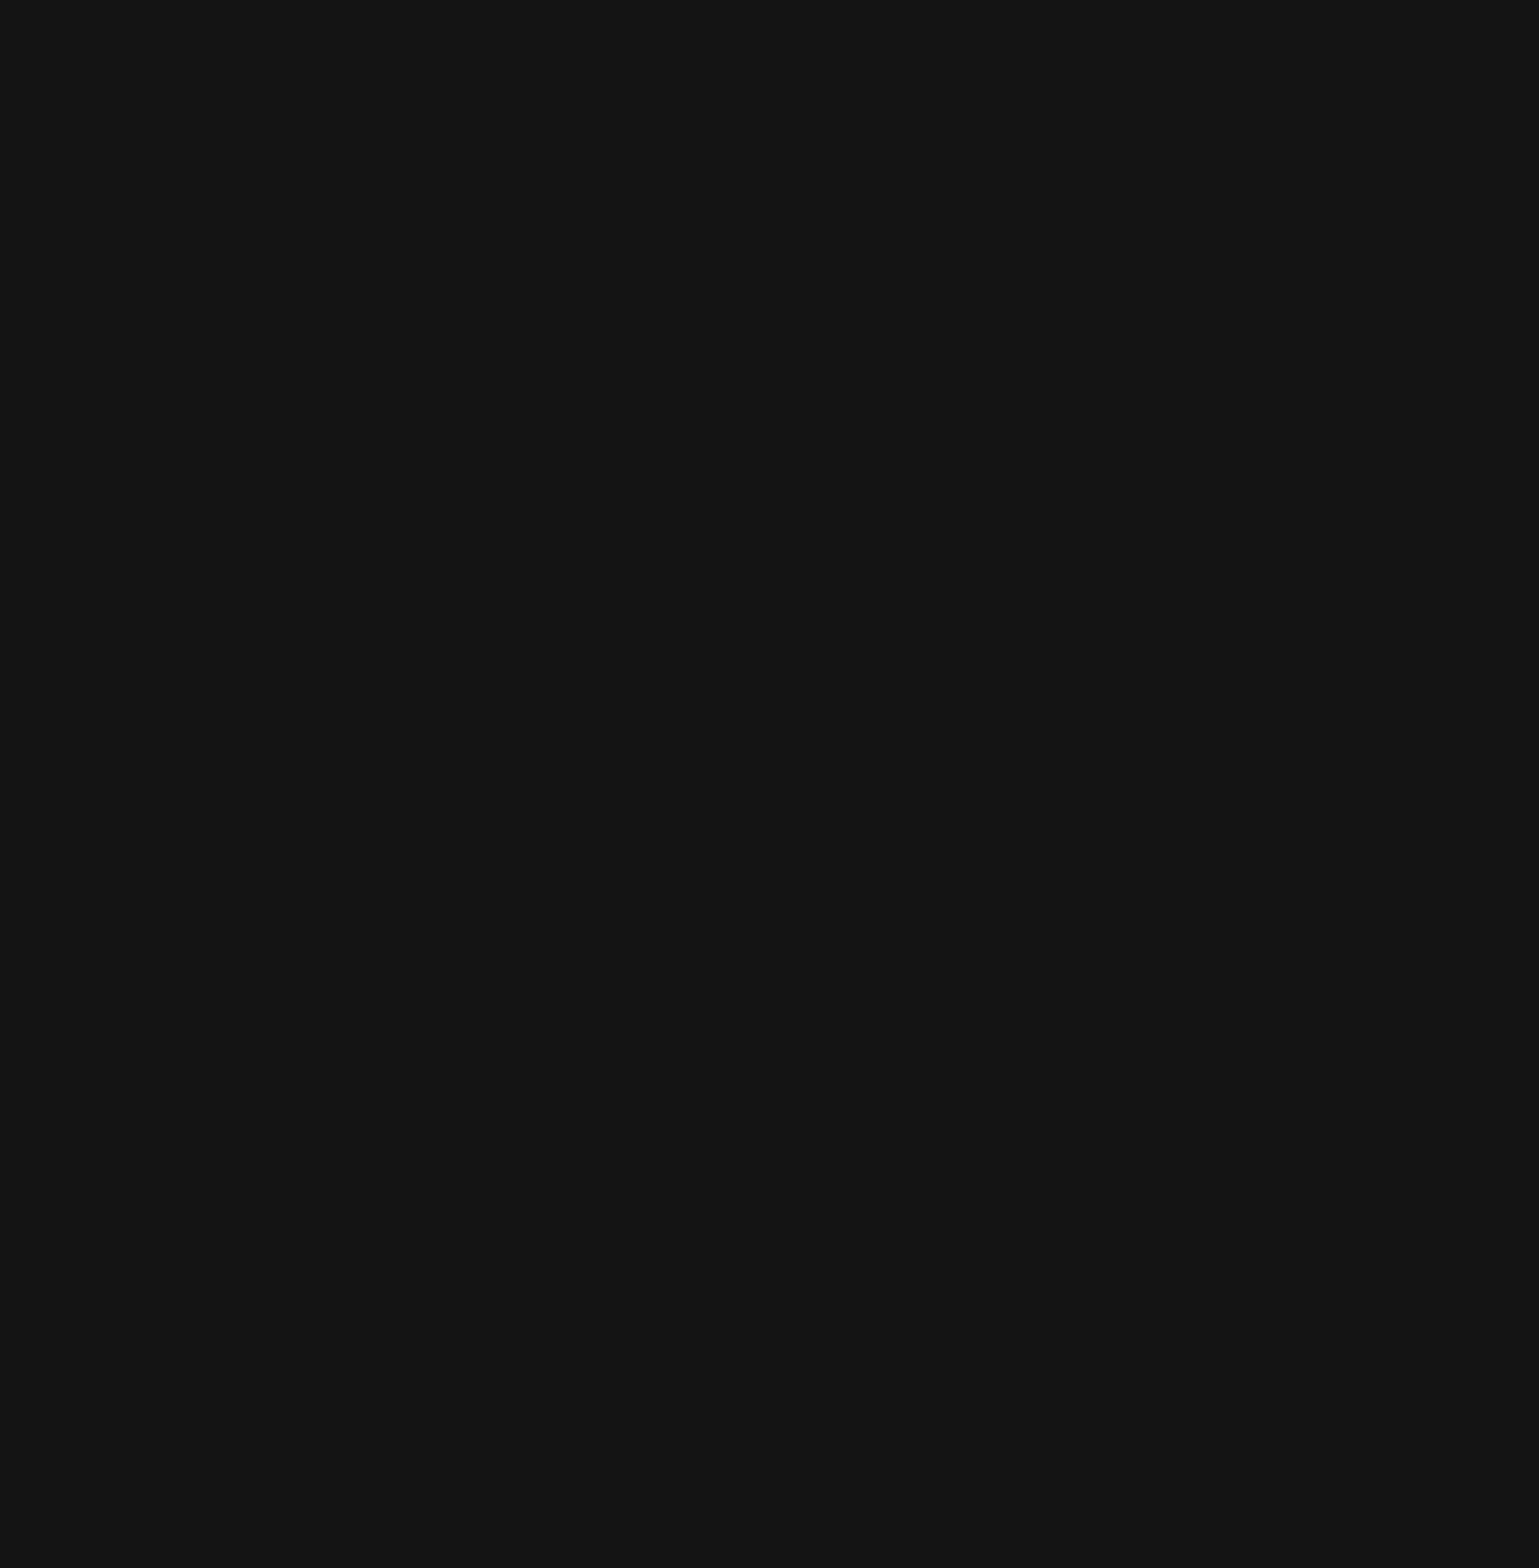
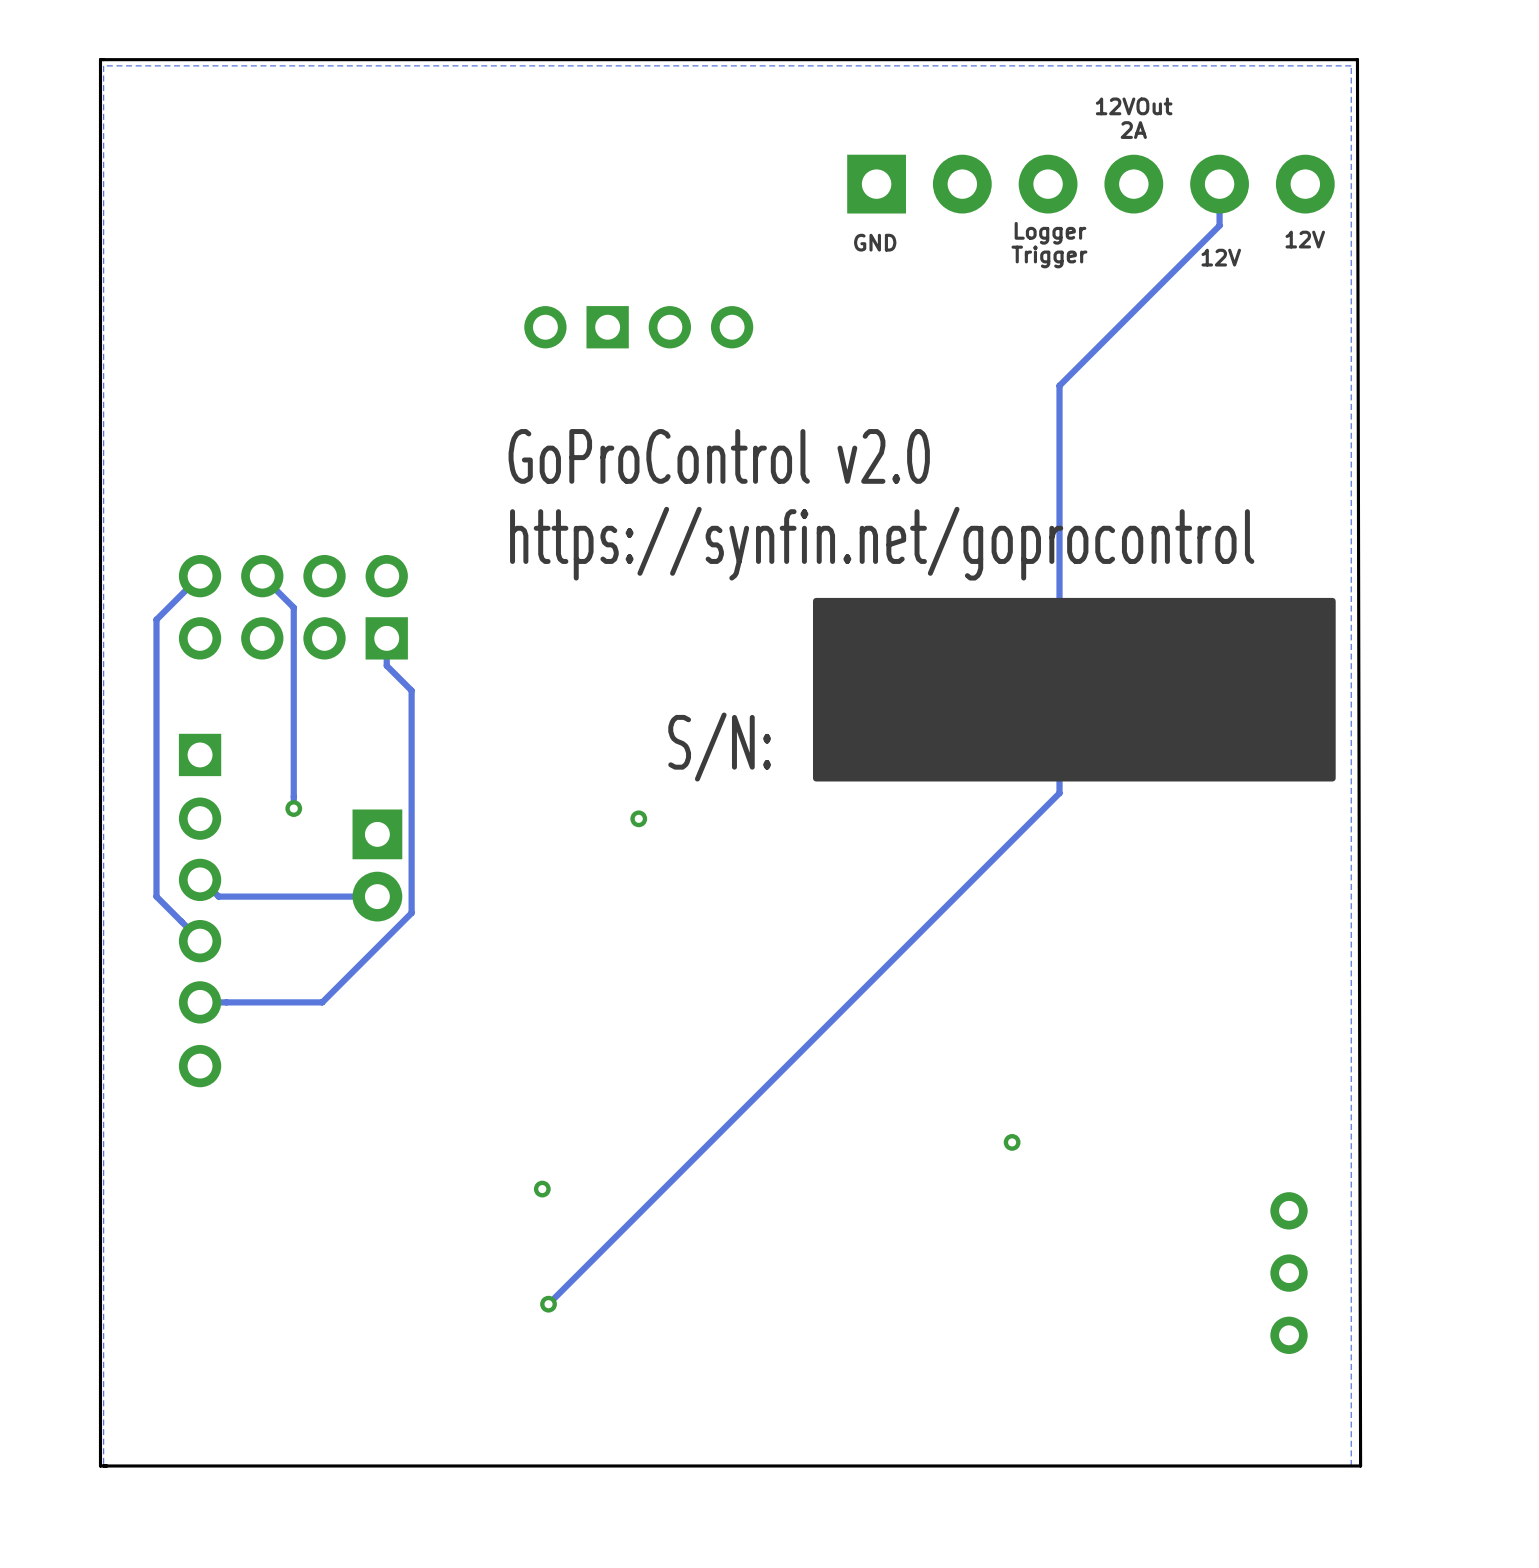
board edge: none -> (1357, 59) (100, 59) (100, 1465) (1360, 1465) (1357, 59)
zone outline: none -> (1351, 65) (103, 65) (103, 1465) (1351, 1465) (1351, 65)
text: none -> 12VOut (1134, 106)
text: none -> 2A (1133, 130)
part: none -> (1090, 184)
track: none -> (1219, 184) (1219, 225) (1059, 385) (1059, 793) (548, 1304)
text: none -> Logger (1050, 233)
text: none -> 12V (1305, 239)
text: none -> GND (875, 242)
text: none -> Trigger (1049, 256)
text: none -> 12V (1221, 257)
part: none -> (638, 327)
text: none -> GoProControl v2.0 (719, 456)
text: none -> https://synfin.net/goprocontrol (882, 543)
track: none -> (200, 576) (156, 619) (156, 896) (200, 940)
track: none -> (262, 576) (293, 607) (293, 808)
drawing: none -> [812, 597, 1336, 782]
part: none -> (293, 607)
track: none -> (386, 638) (386, 665) (411, 690) (411, 913) (322, 1002) (200, 1002)
text: none -> S/N: (719, 747)
via: none -> (293, 808)
via: none -> (638, 818)
part: none -> (377, 865)
track: none -> (200, 877) (218, 896) (377, 896)
part: none -> (200, 910)
via: none -> (1012, 1142)
via: none -> (542, 1189)
part: none -> (1289, 1273)
via: none -> (548, 1304)

